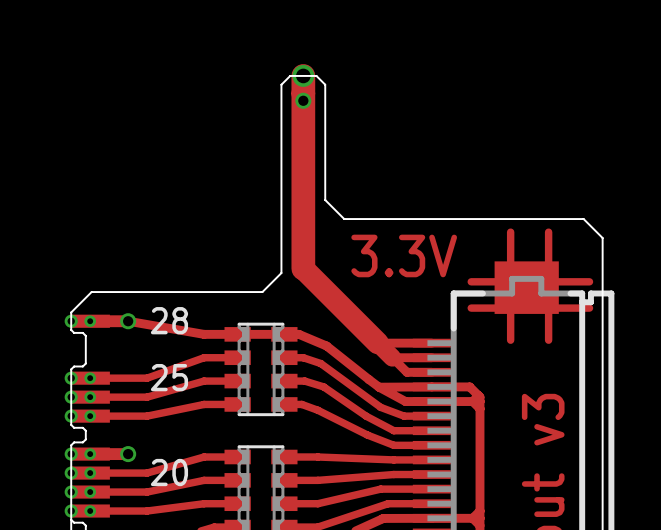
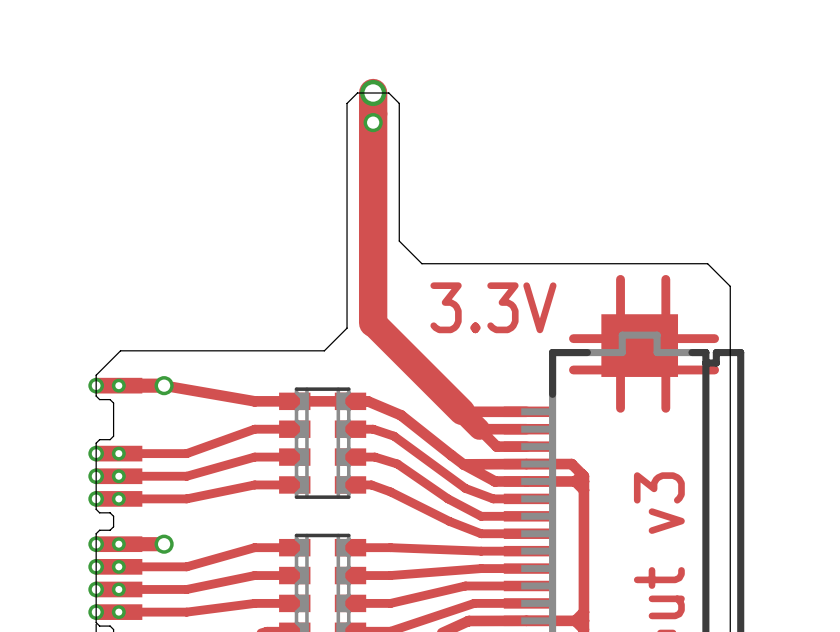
text: 28 (169, 320) -> none
text: 25 (169, 377) -> none
text: 20 (169, 472) -> none

